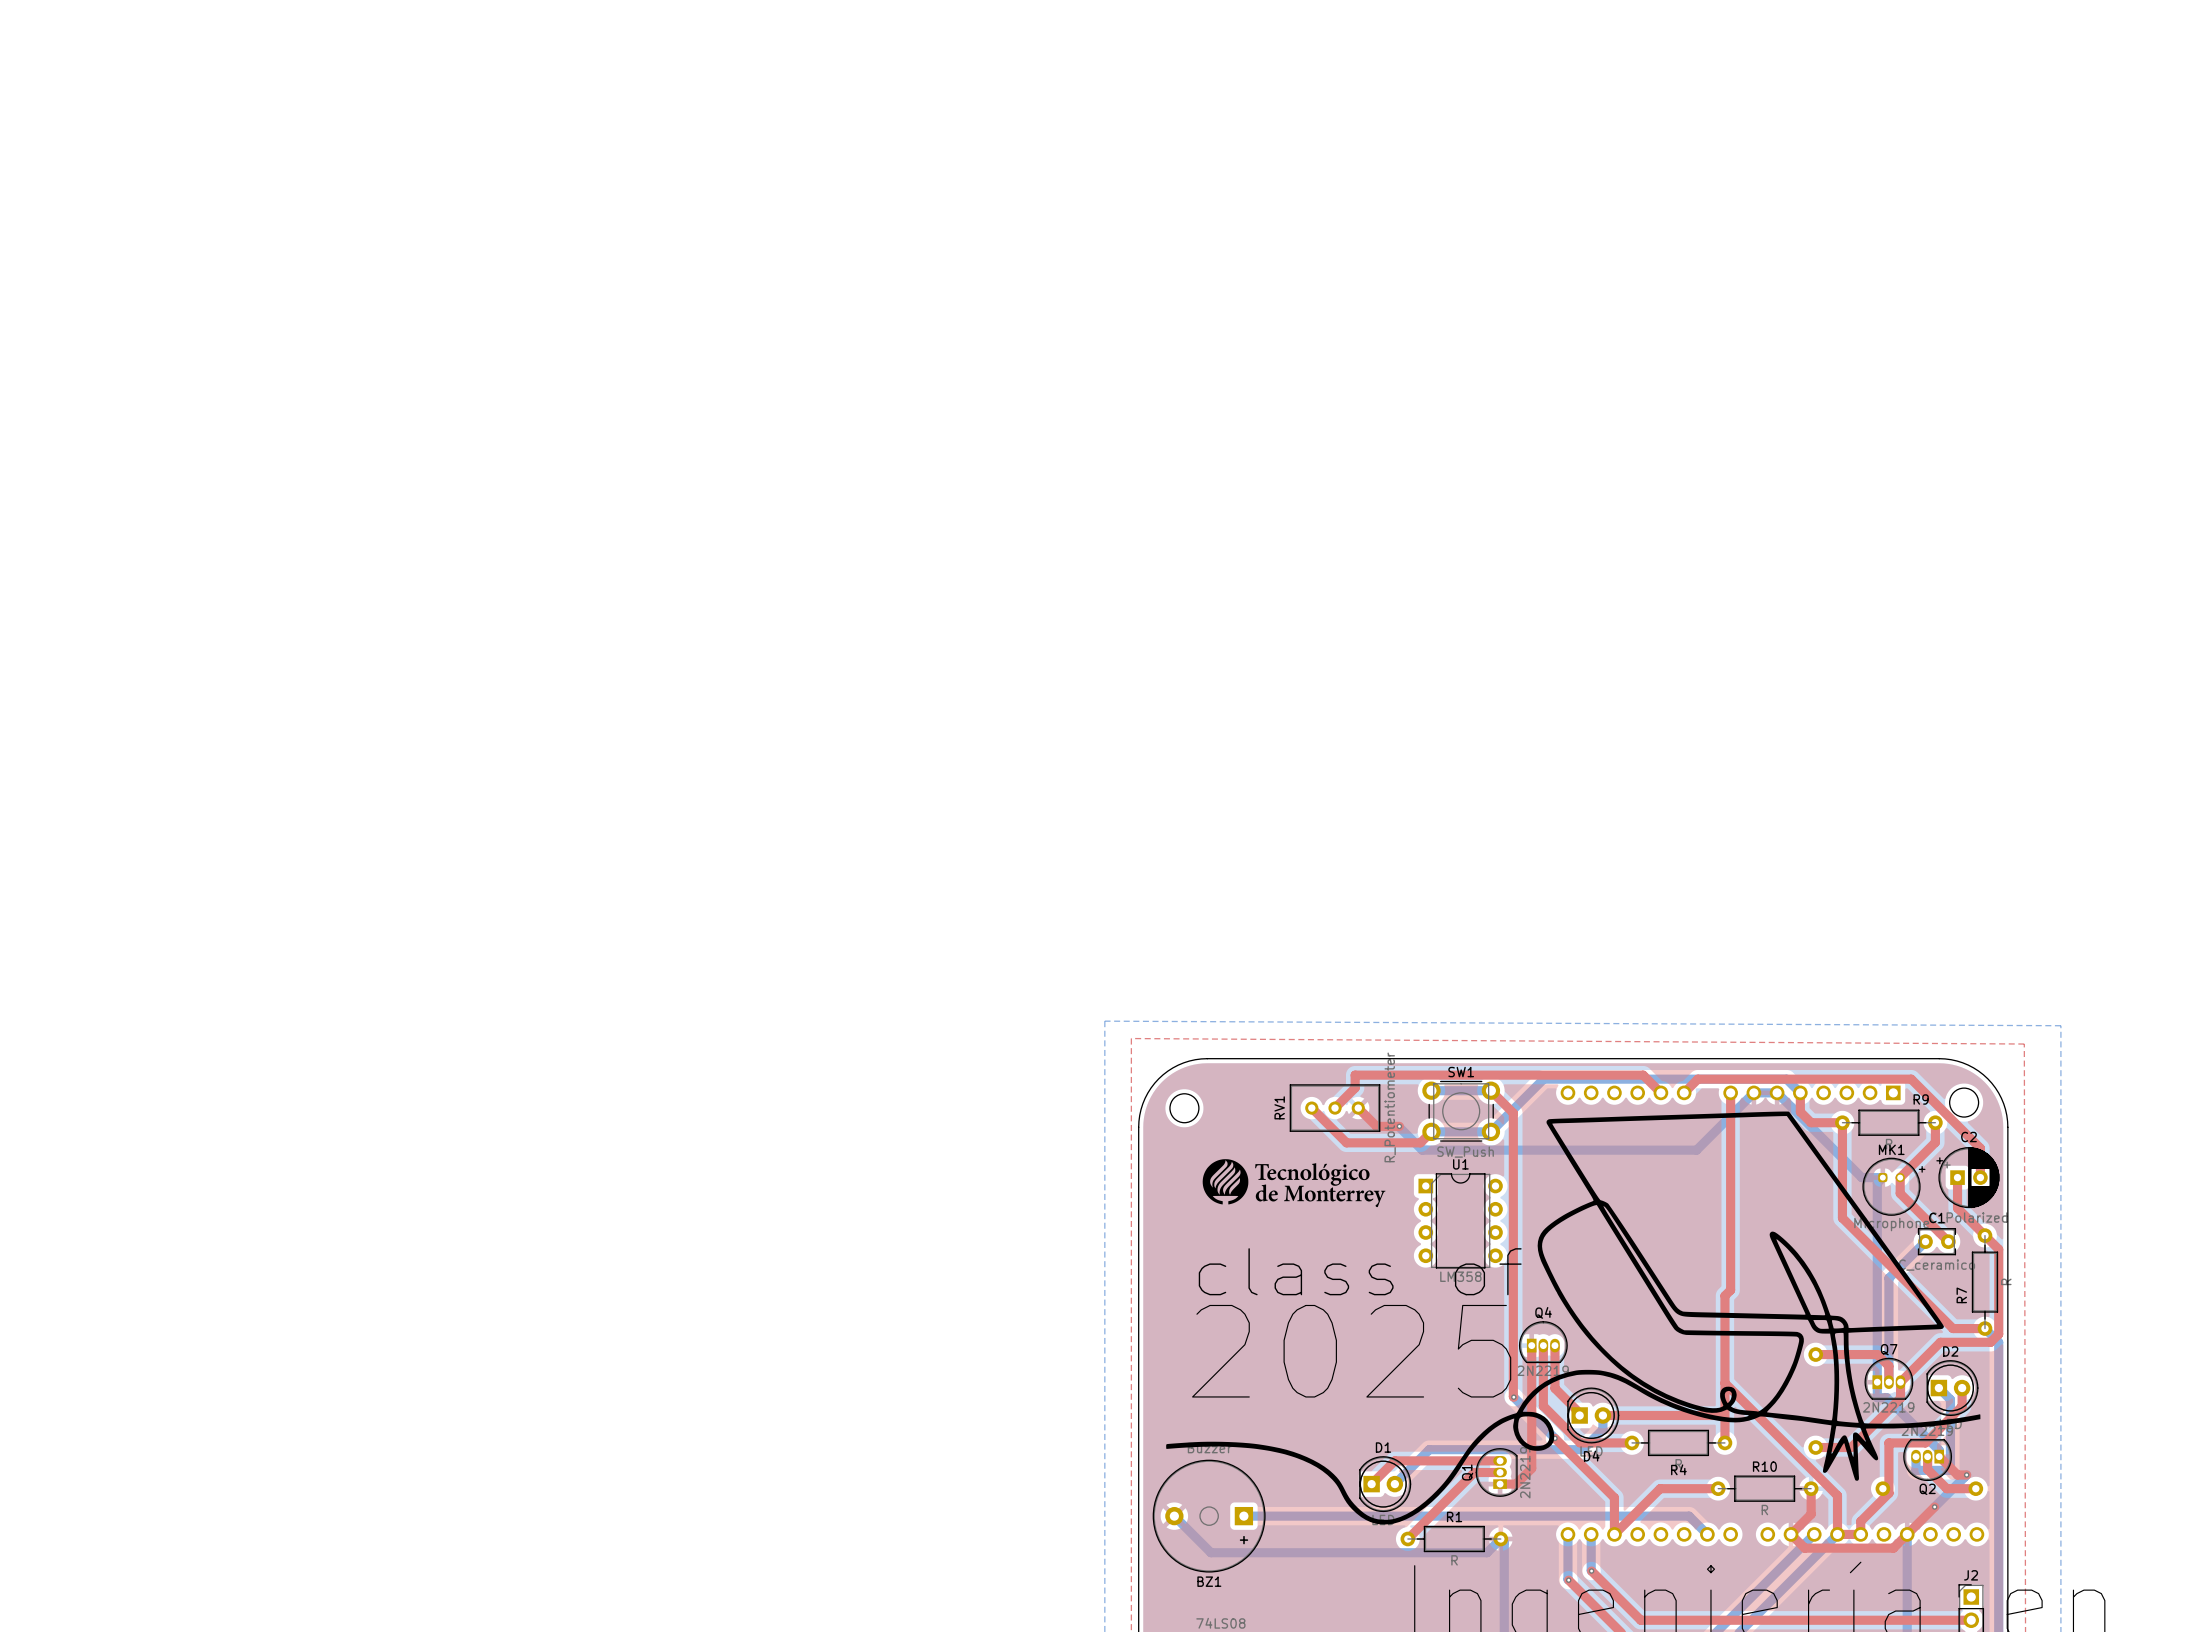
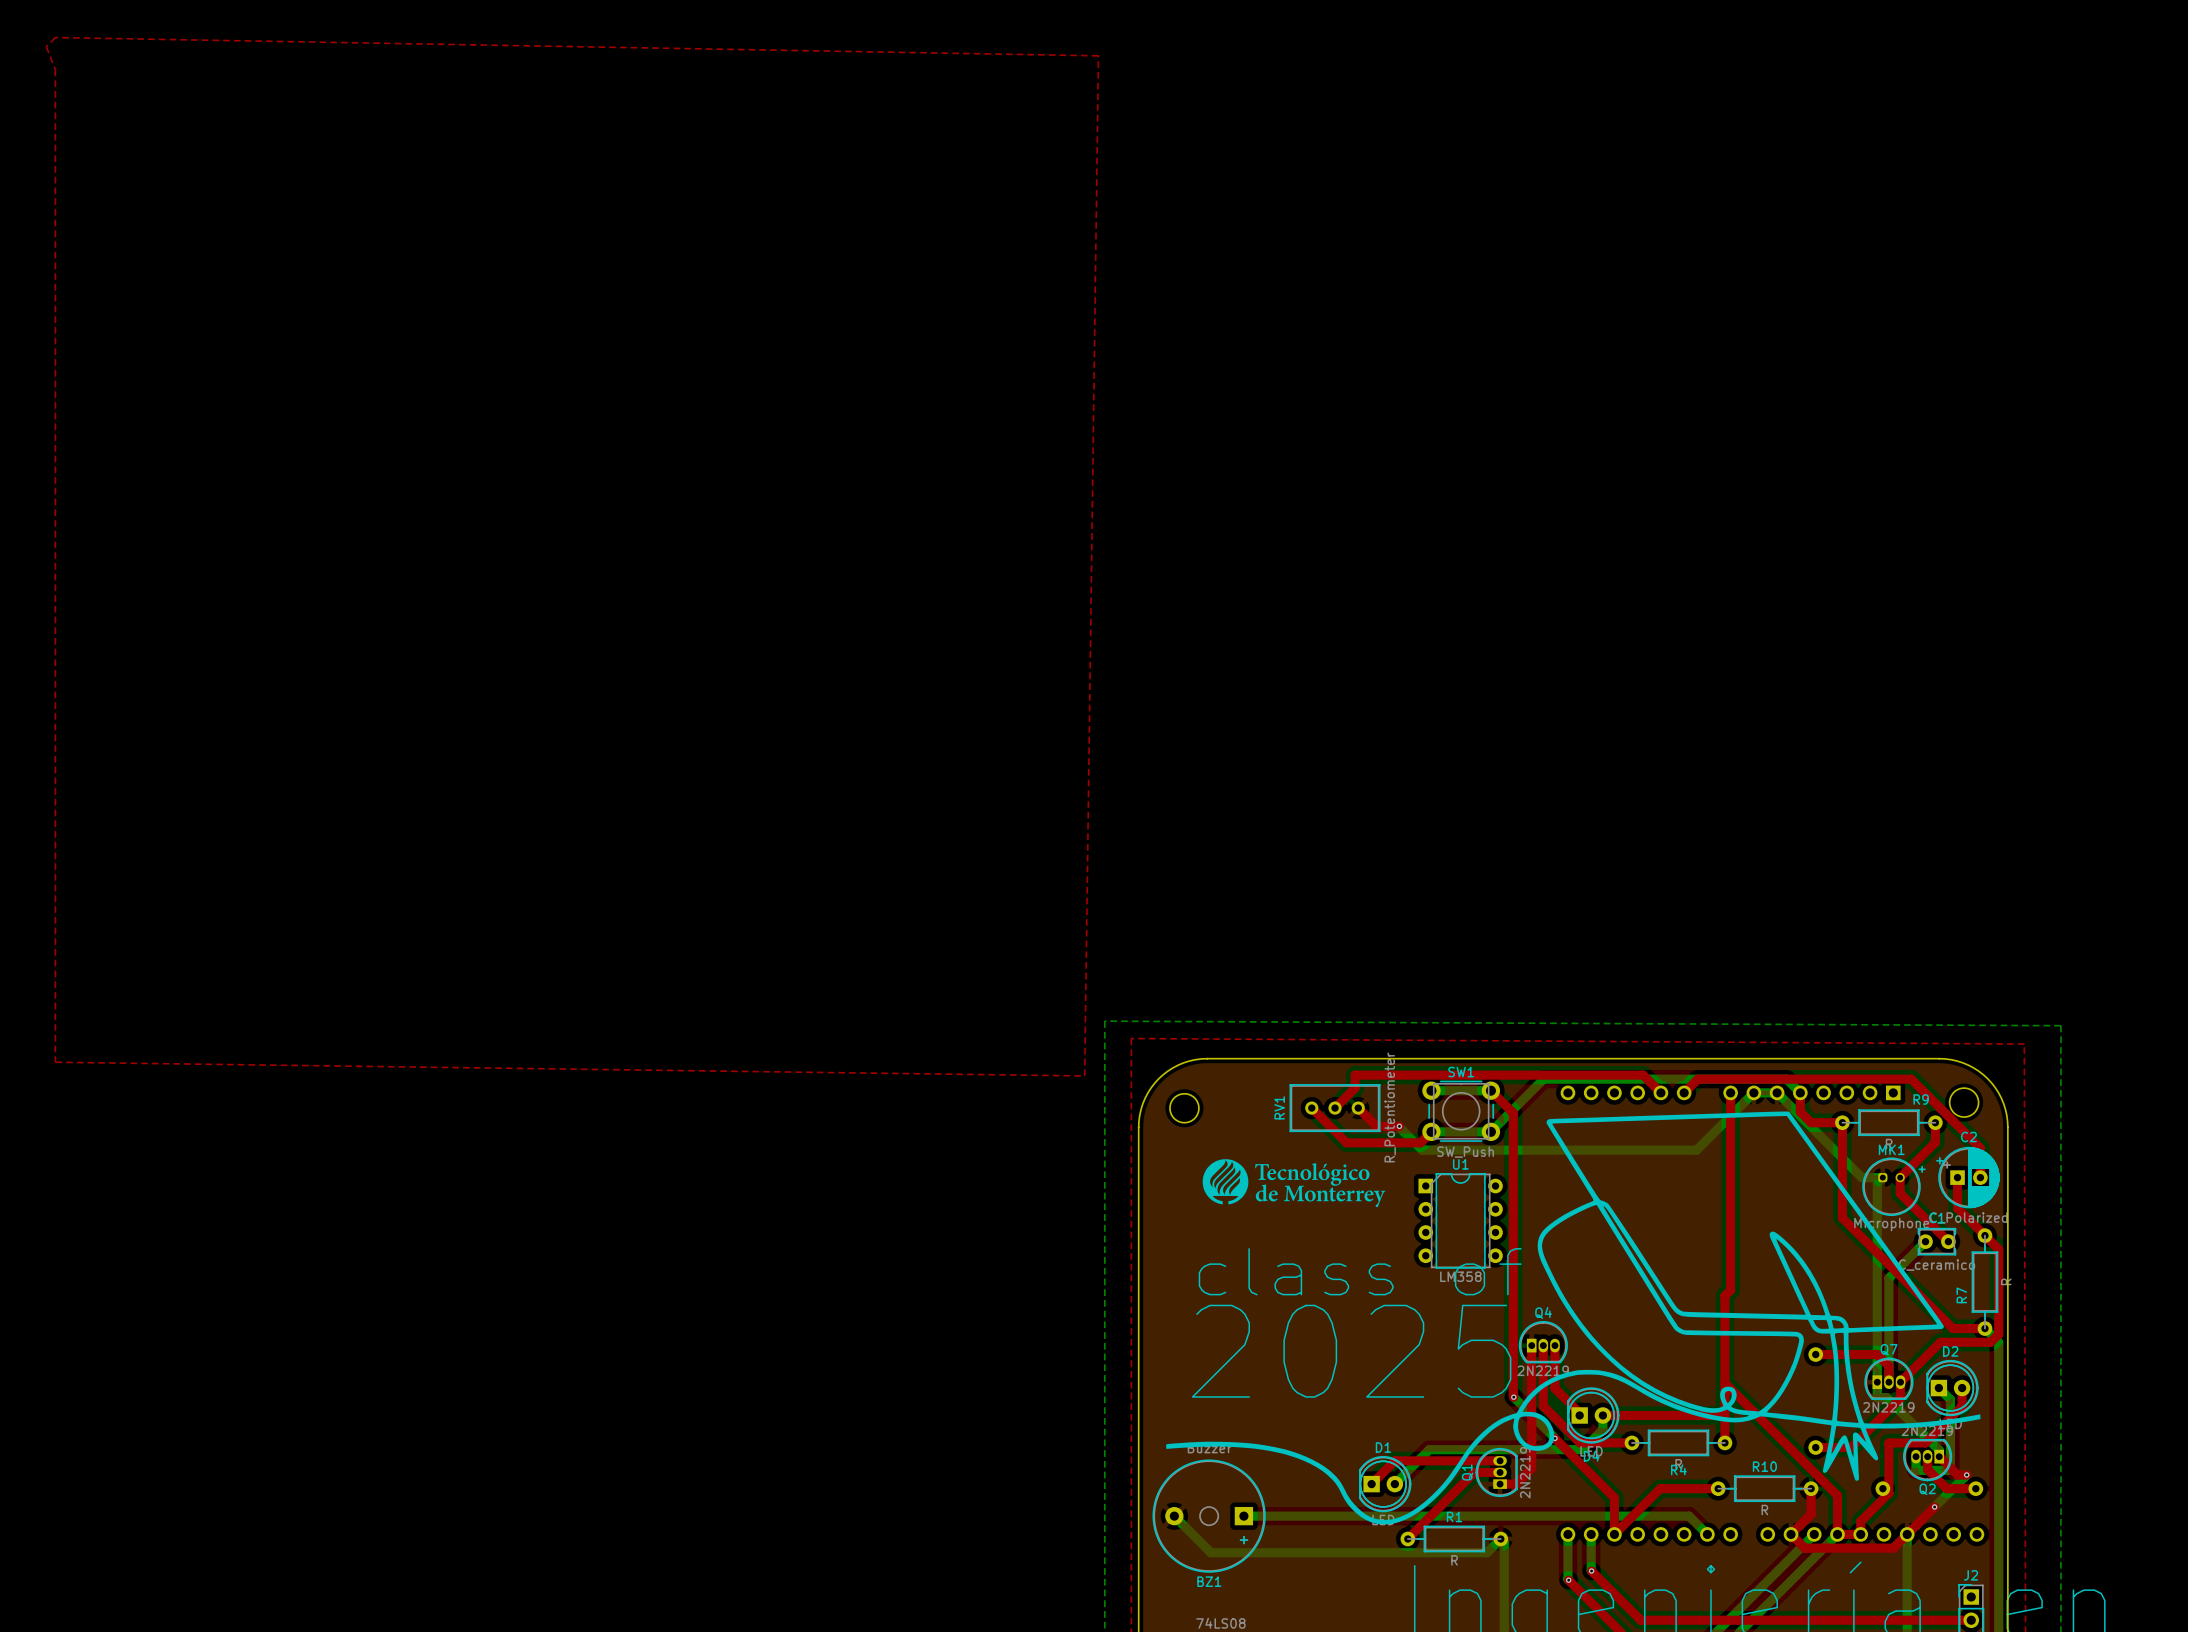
top zone outline: none -> (55, 37) (1098, 55) (1084, 1075) (55, 1062) (55, 69) (46, 46) (55, 37)

